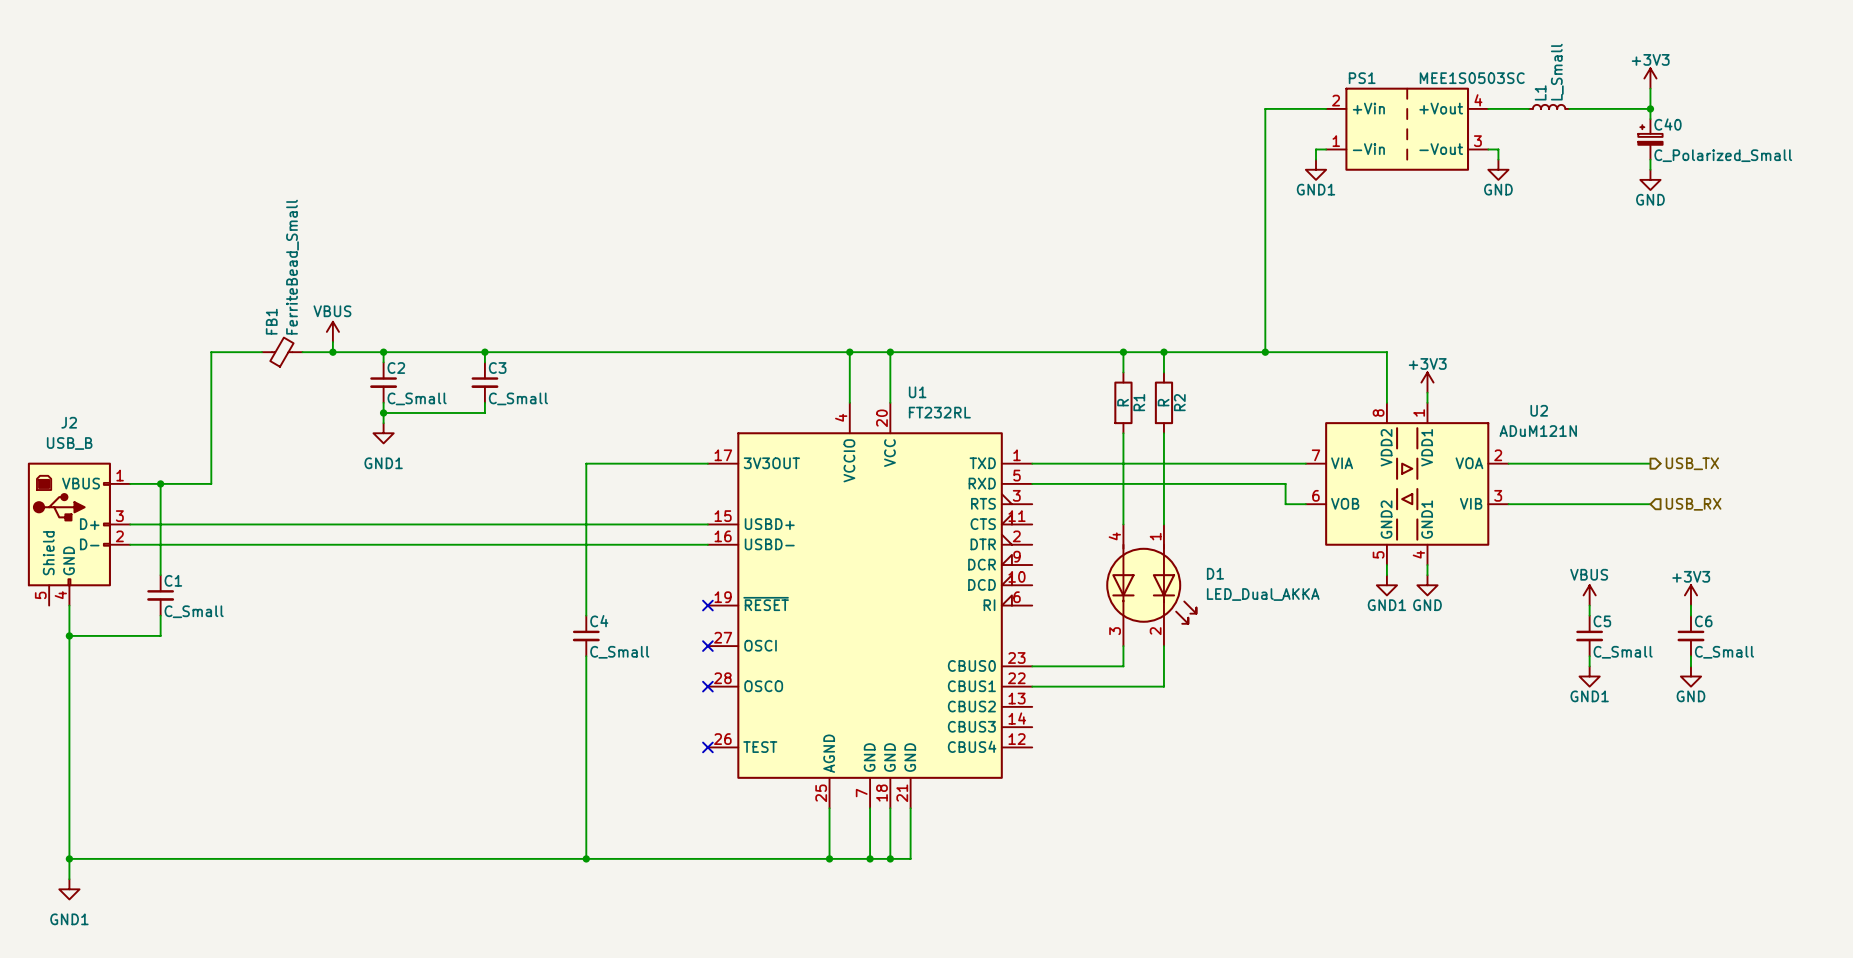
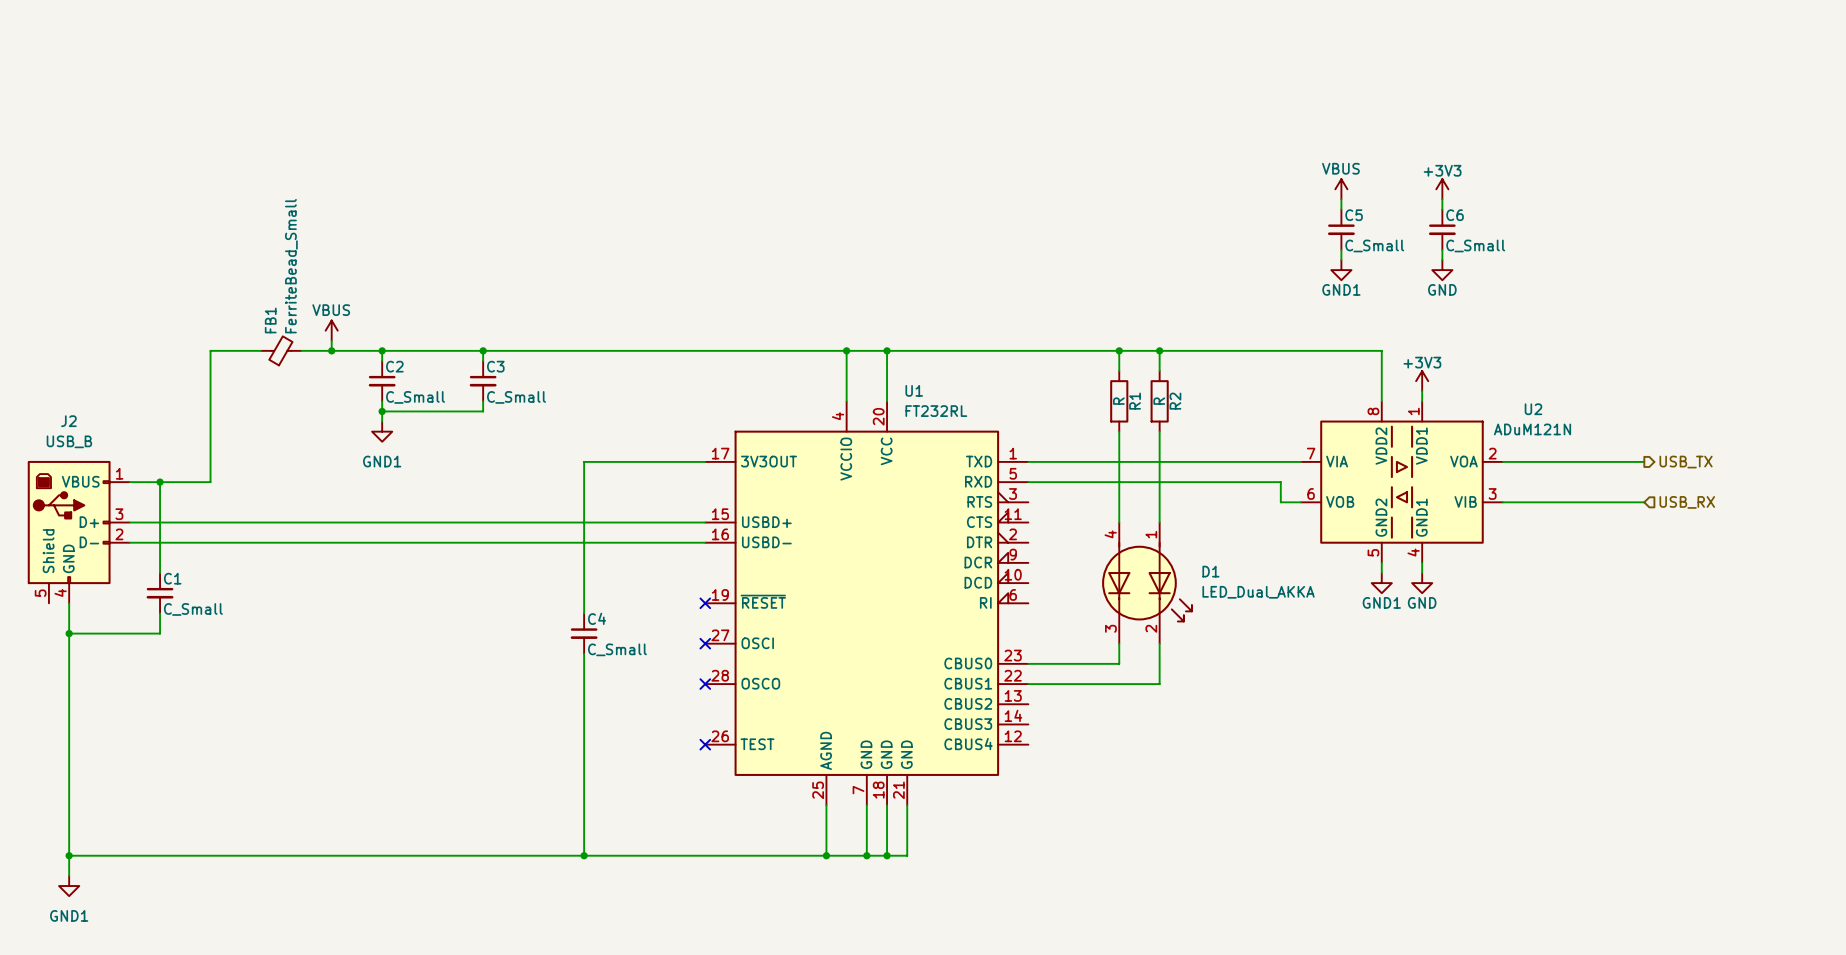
power symbol: +3V3 (1650, 78) -> none
wire: (1650, 88) (1650, 119) -> none
L1: L_Small (1549, 106) -> none
wire: (1326, 108) (1265, 108) (1265, 352) -> none
wire: (1488, 108) (1528, 108) -> none
wire: (1569, 108) (1650, 108) -> none
junction: (1650, 108) -> none
PS1: MEE1S0503SC (1407, 129) -> none
C40: C_Polarized_Small (1650, 139) -> none
wire: (1326, 149) (1316, 149) (1316, 159) -> none
wire: (1488, 149) (1498, 149) (1498, 159) -> none
wire: (1650, 159) (1650, 169) -> none
power symbol position: GND1 (1316, 169) -> GND1 (1341, 270)
power symbol: GND (1498, 169) -> none
power symbol: GND (1650, 179) -> none
power symbol: none -> VBUS (1341, 189)
power symbol: none -> +3V3 (1442, 189)
wire: none -> (1341, 199) (1341, 209)
wire: none -> (1442, 199) (1442, 209)
wire: none -> (1341, 249) (1341, 259)
wire: none -> (1442, 249) (1442, 259)
power symbol: none -> GND (1442, 270)
junction: (1265, 352) -> none
power symbol: VBUS (1589, 595) -> none
power symbol: +3V3 (1690, 595) -> none
wire: (1589, 605) (1589, 615) -> none
wire: (1690, 605) (1690, 615) -> none
C5 position: (1589, 635) -> (1341, 229)
C6 position: (1690, 635) -> (1442, 229)
wire: (1589, 656) (1589, 666) -> none
wire: (1690, 656) (1690, 666) -> none
power symbol: GND1 (1589, 676) -> none
power symbol: GND (1690, 676) -> none

